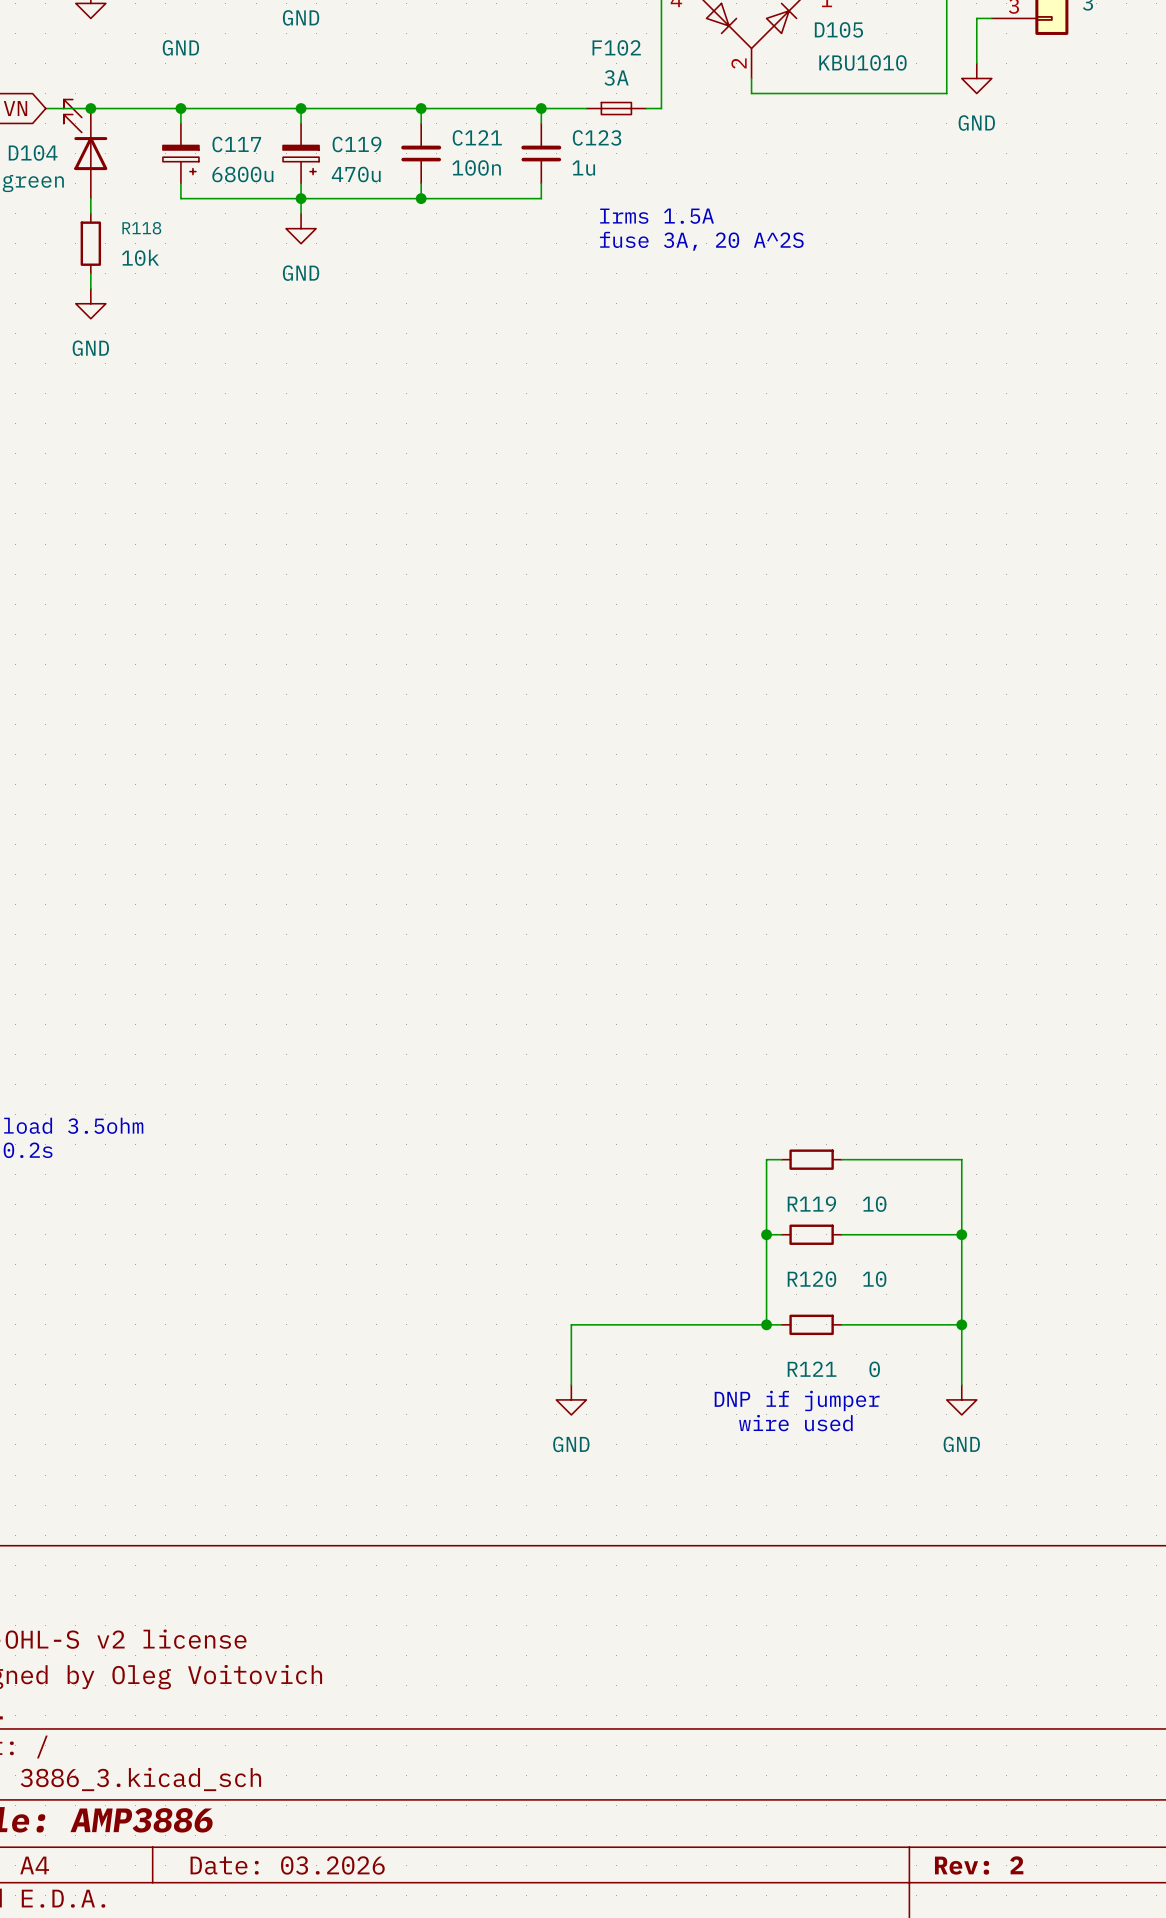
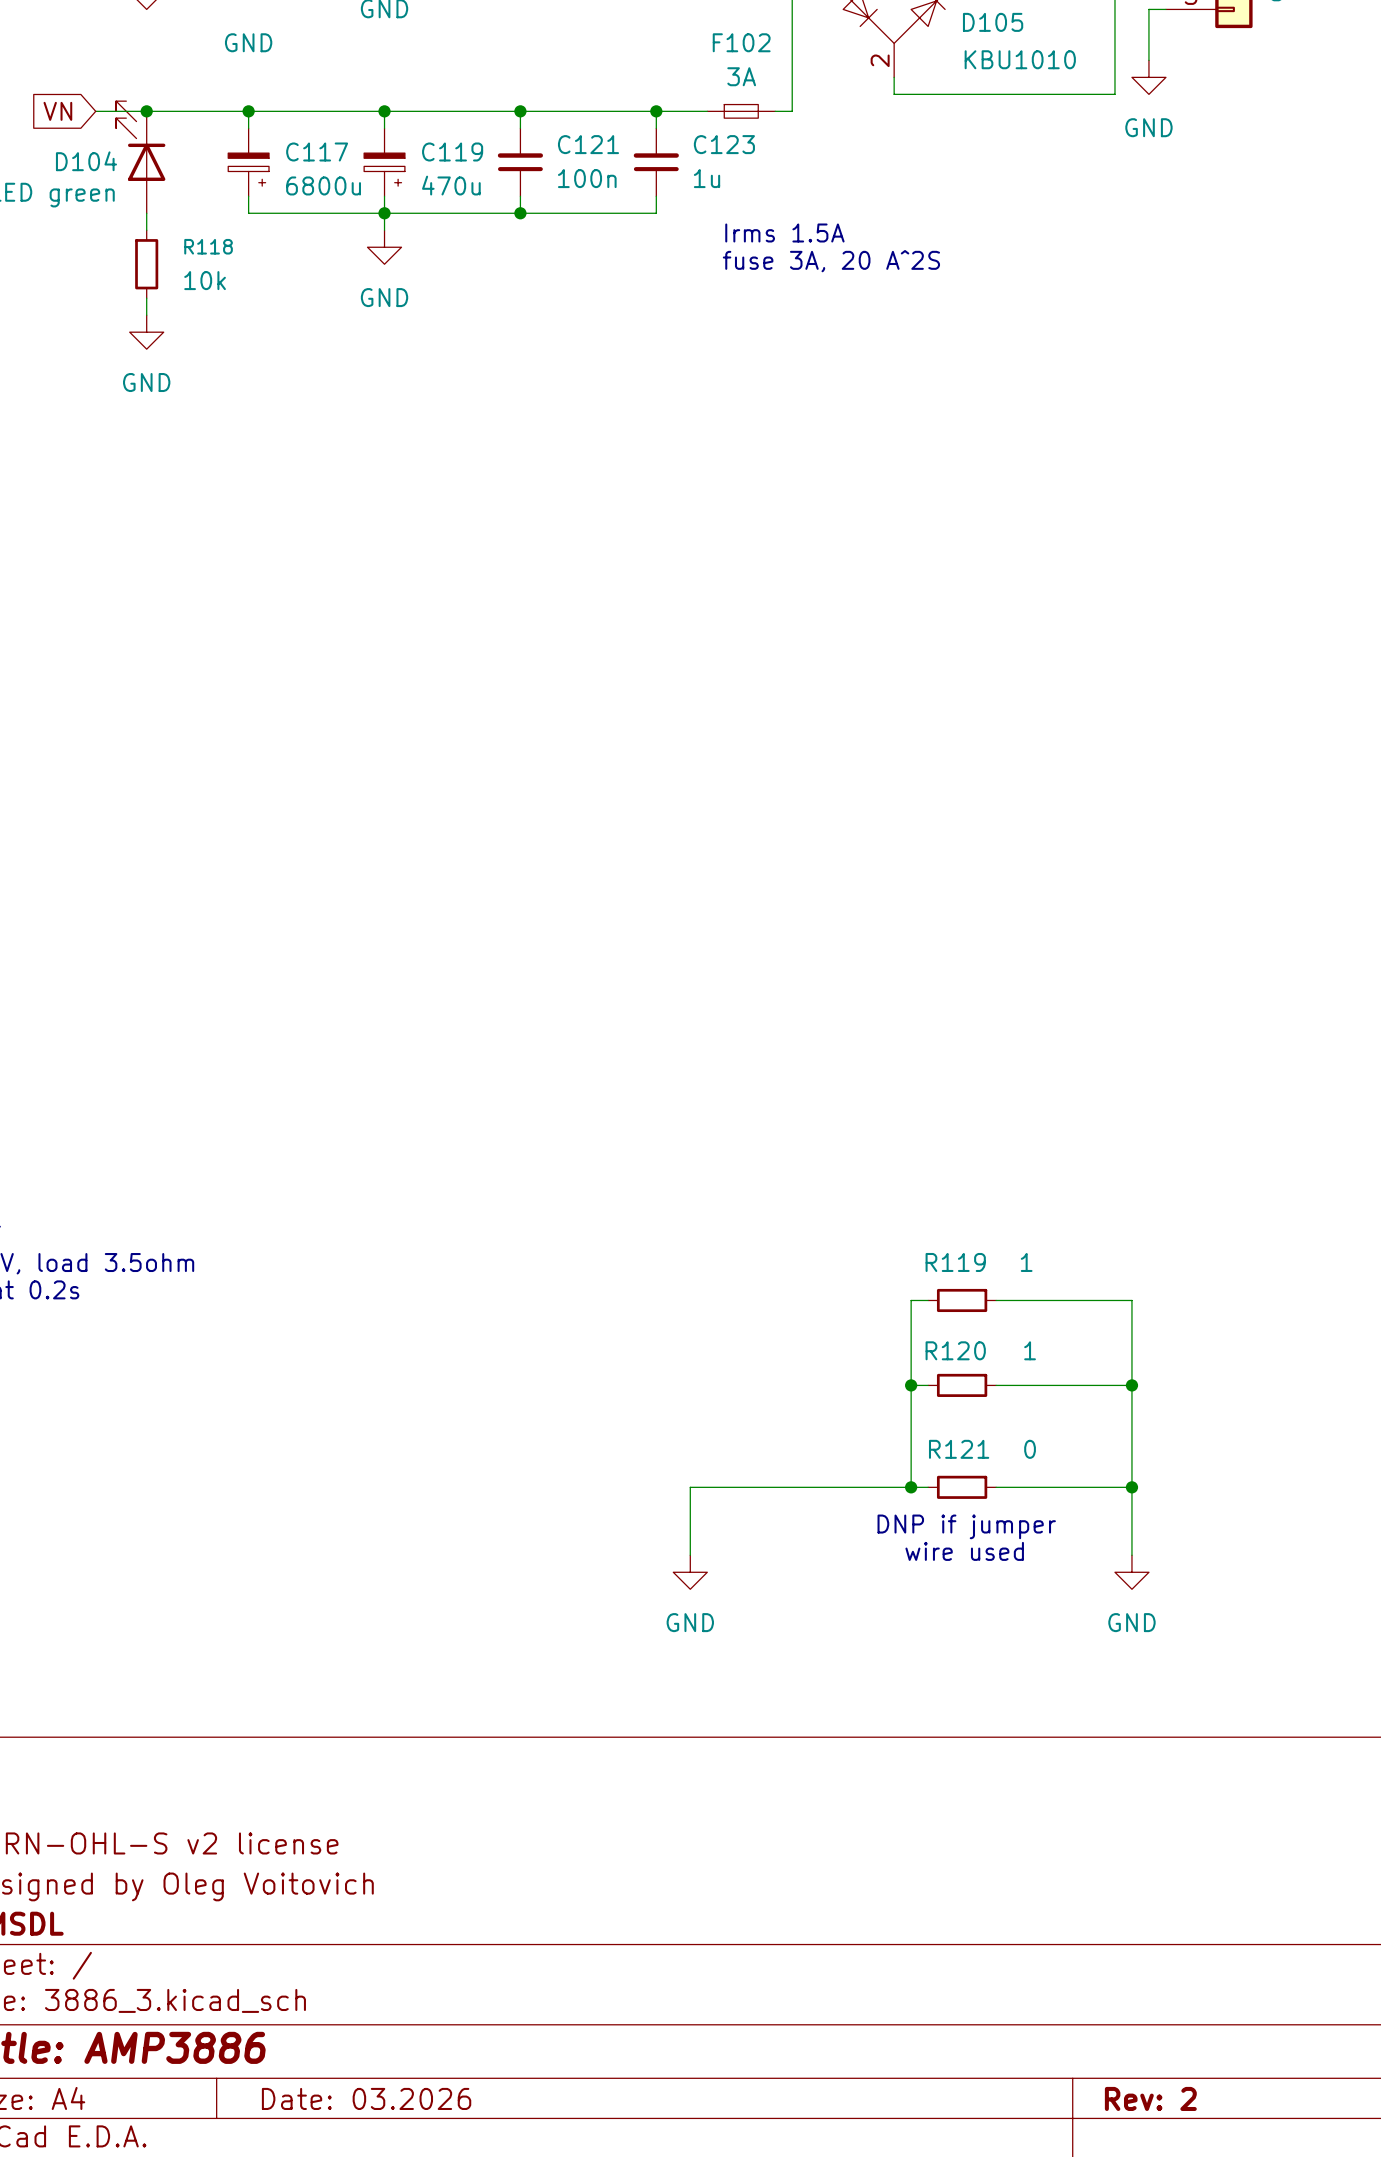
R119 name position: R119 (811, 1204) -> R119 (955, 1262)
R119 value: 10 (874, 1204) -> 1 (1026, 1262)
R120 name position: R120 (811, 1279) -> R120 (955, 1350)
R120 value: 10 (874, 1279) -> 1 (1030, 1350)
R121 name position: R121 (812, 1369) -> R121 (959, 1449)
R121 value position: 0 (874, 1369) -> 0 (1030, 1449)
text position: DNP if jumper (797, 1400) -> DNP if jumper (966, 1526)
text position: wire used (795, 1423) -> wire used (964, 1551)

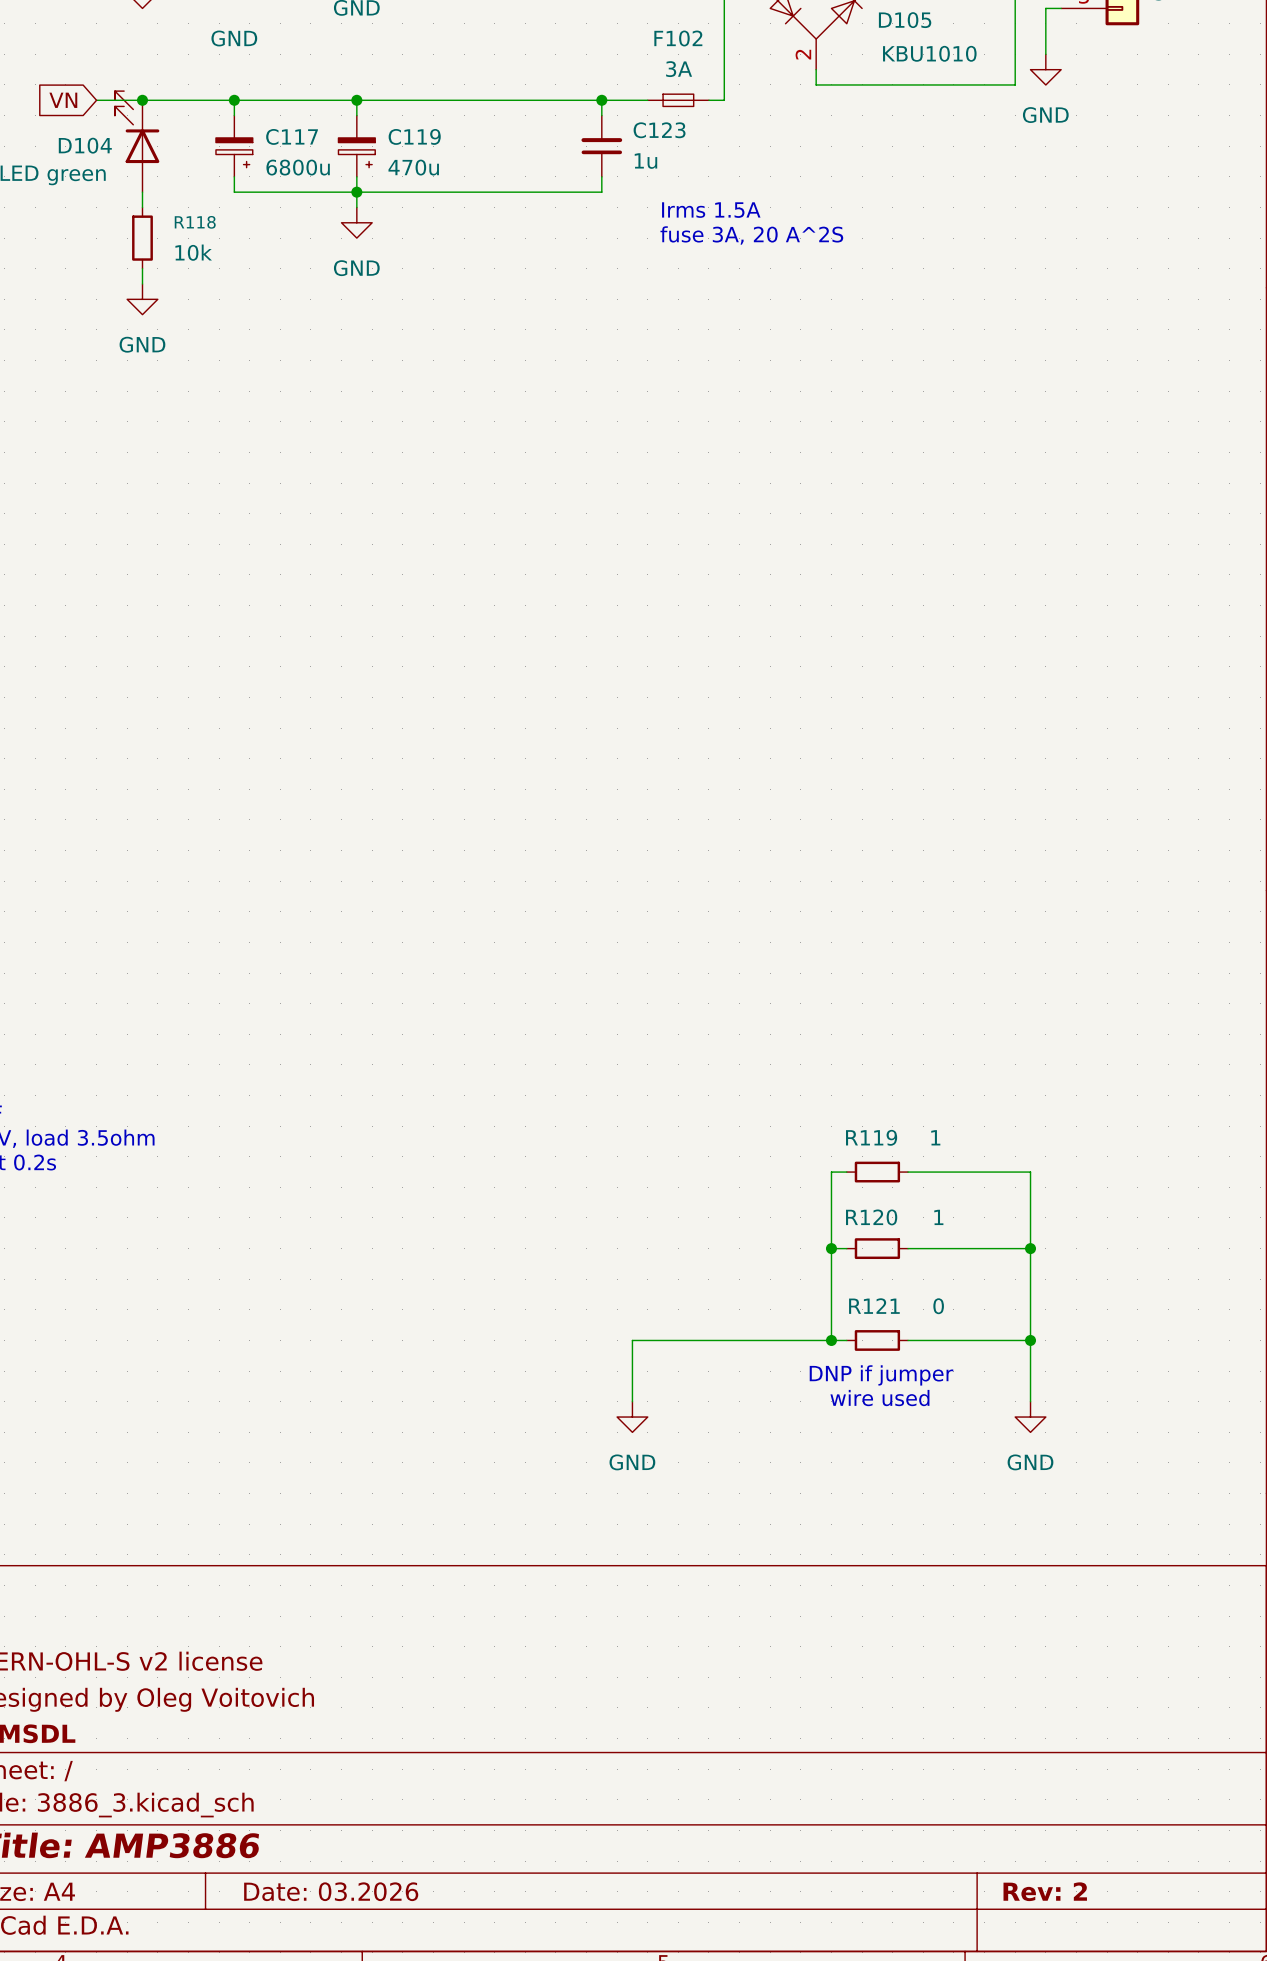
wire: (520, 111) (520, 128) -> none
junction: (520, 111) -> none
C121: 100n (520, 162) -> none
wire: (520, 196) (520, 213) -> none
junction: (520, 213) -> none

